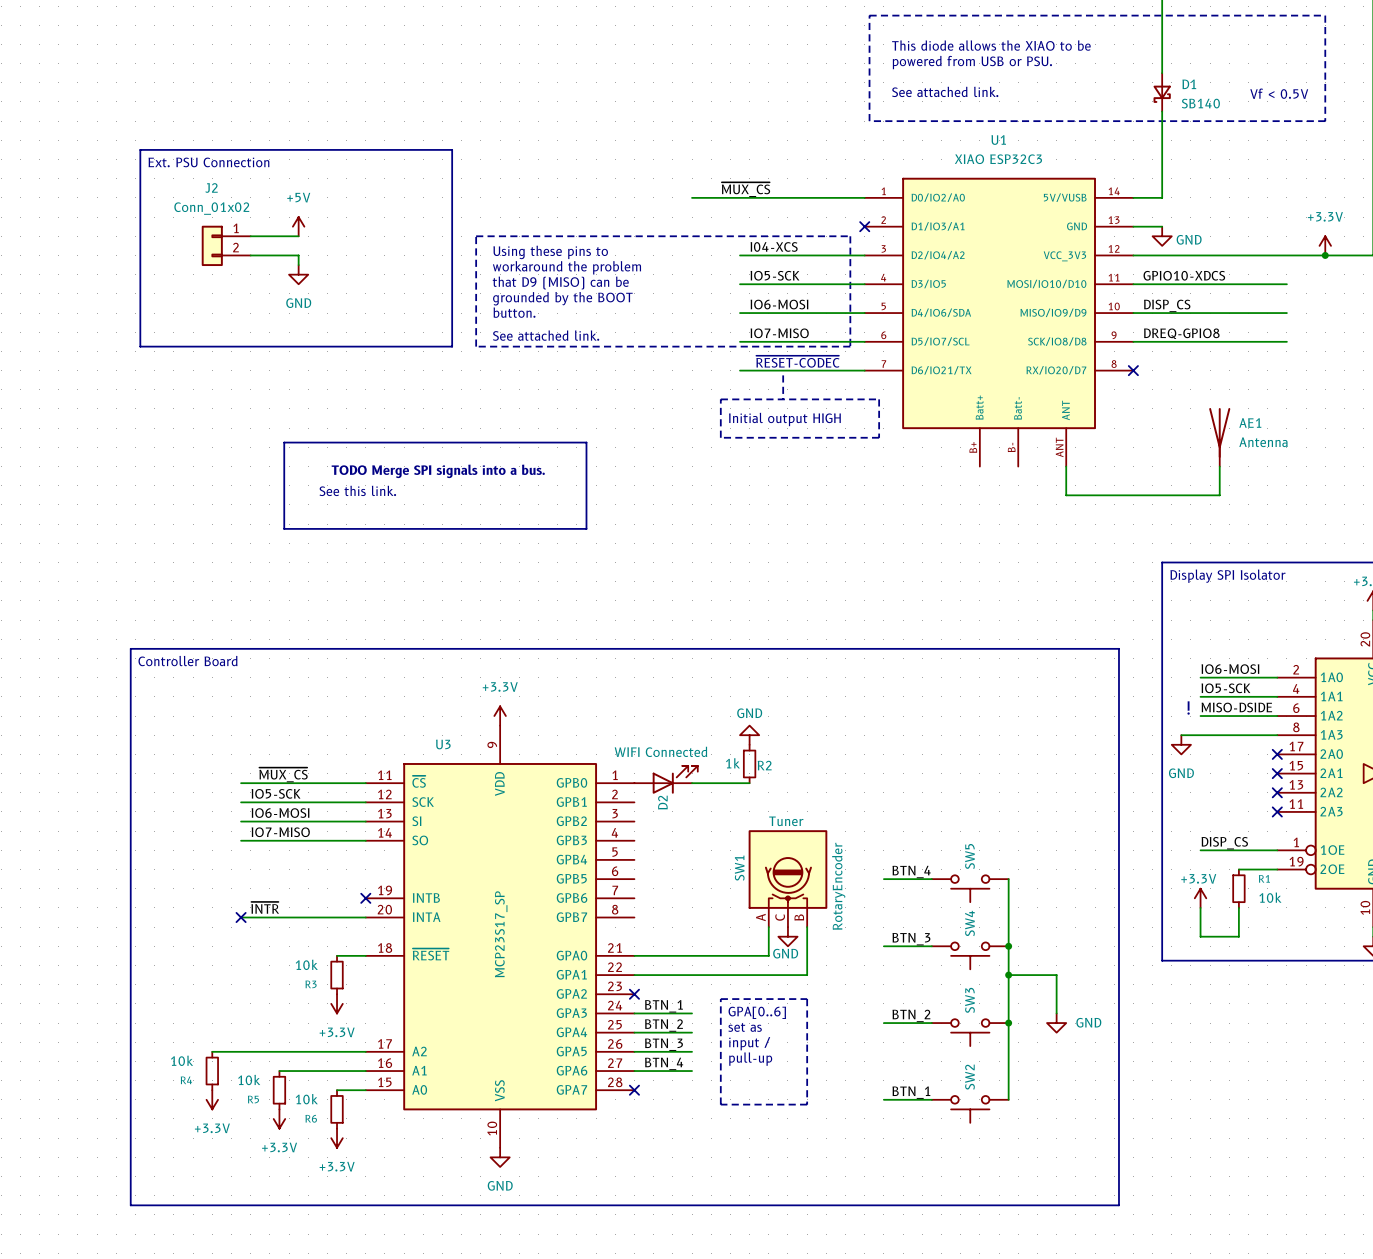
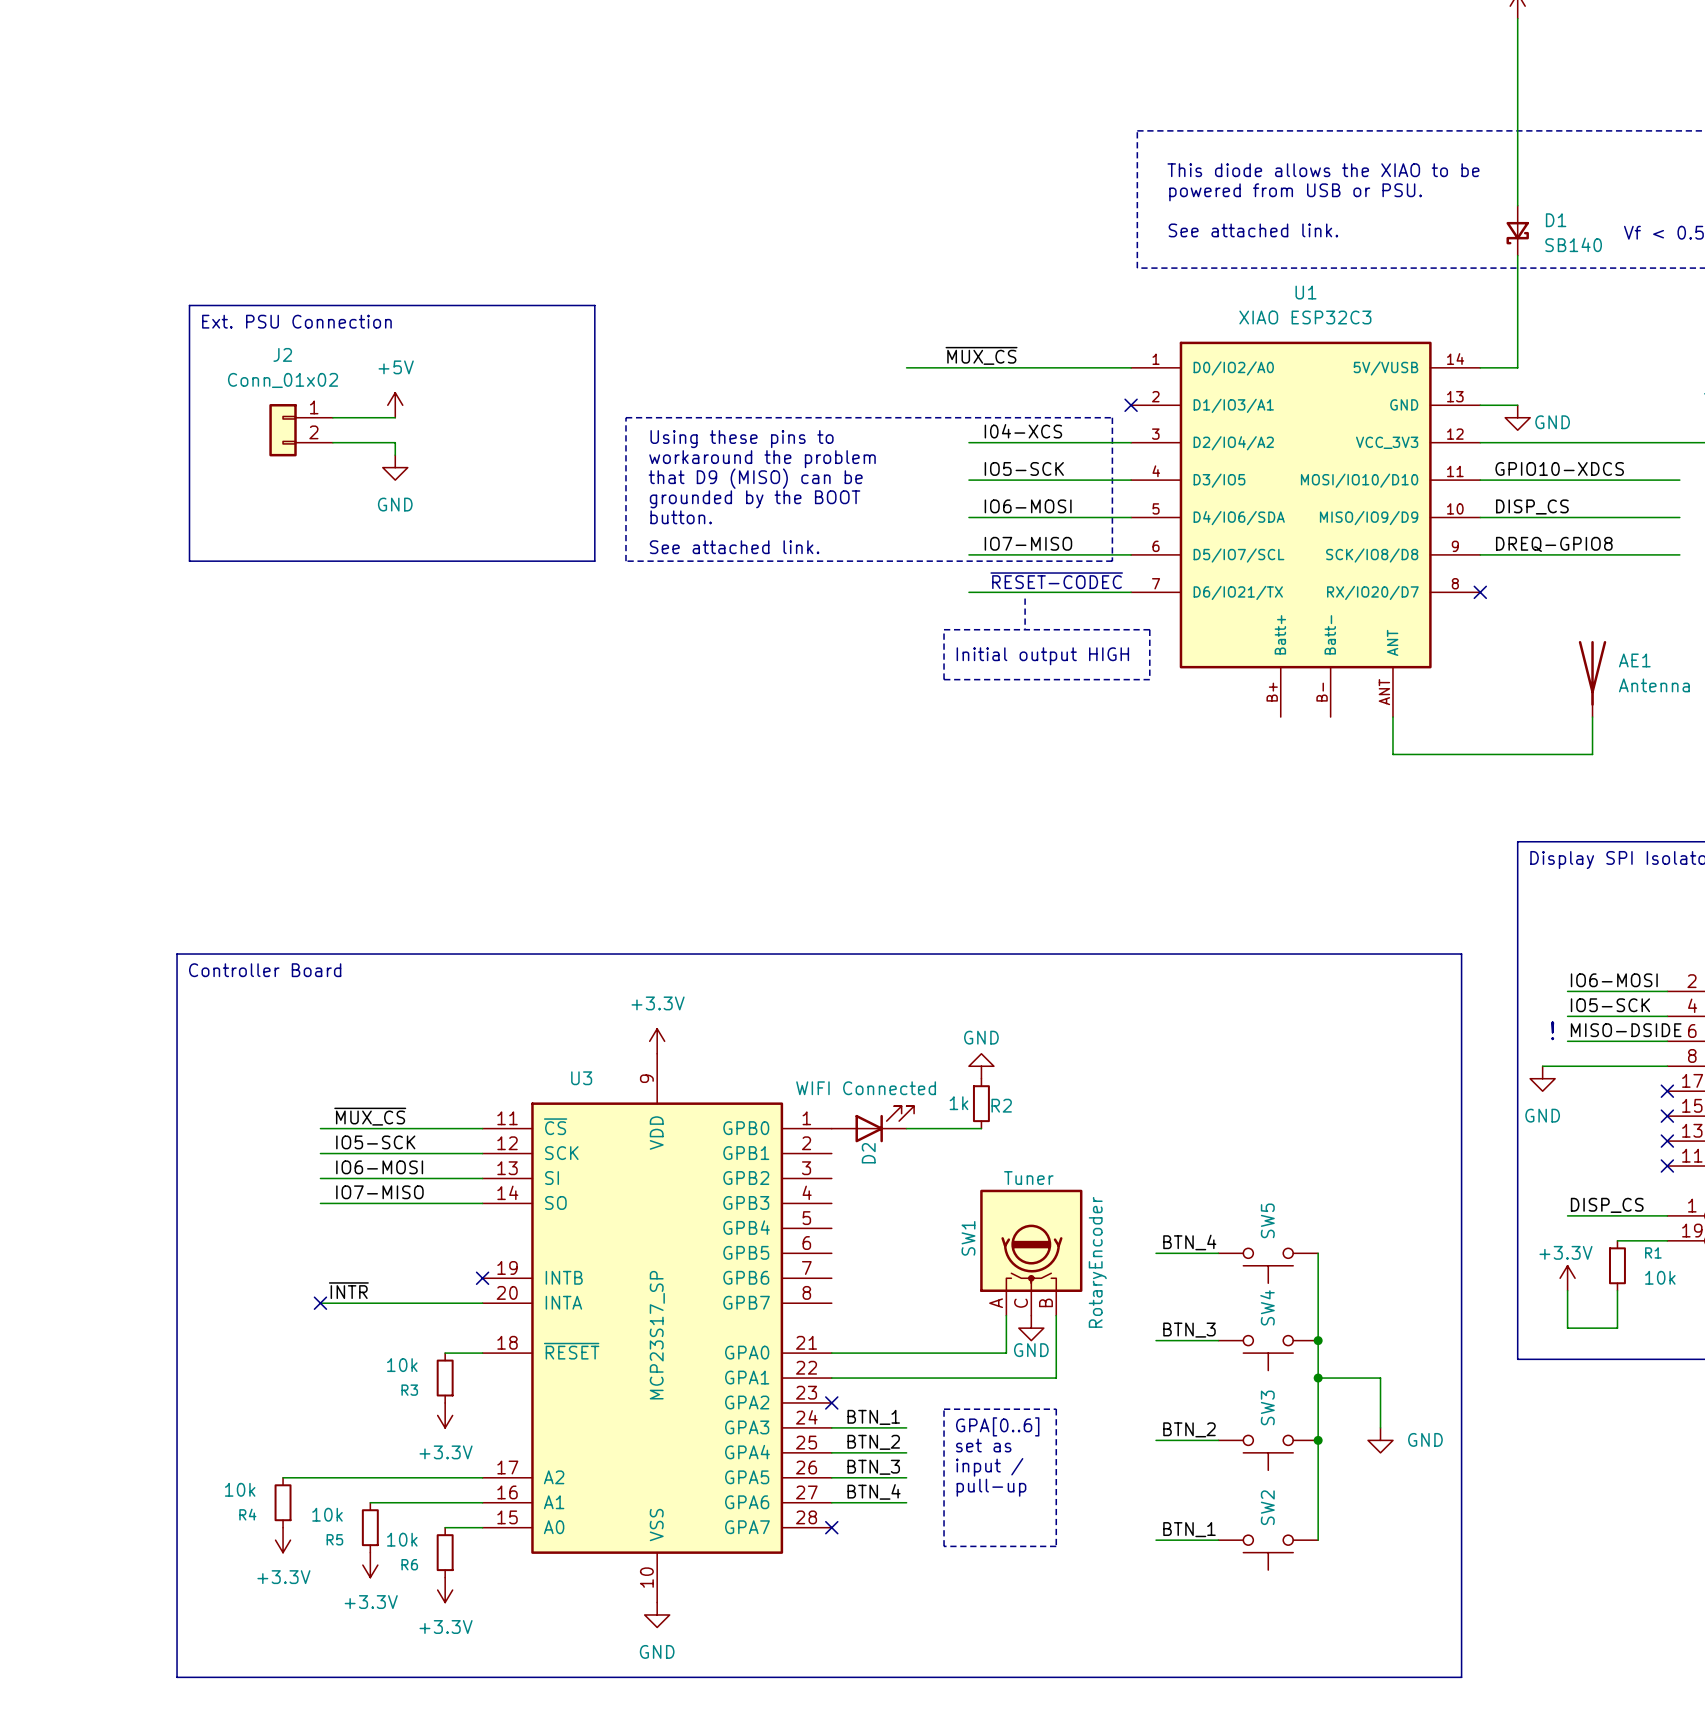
line: (284, 442) (586, 442) (586, 528) (284, 528) (284, 442) -> none
text: TODO Merge SPI signals into a bus. (438, 471) -> none
text: See this link. (357, 490) -> none

